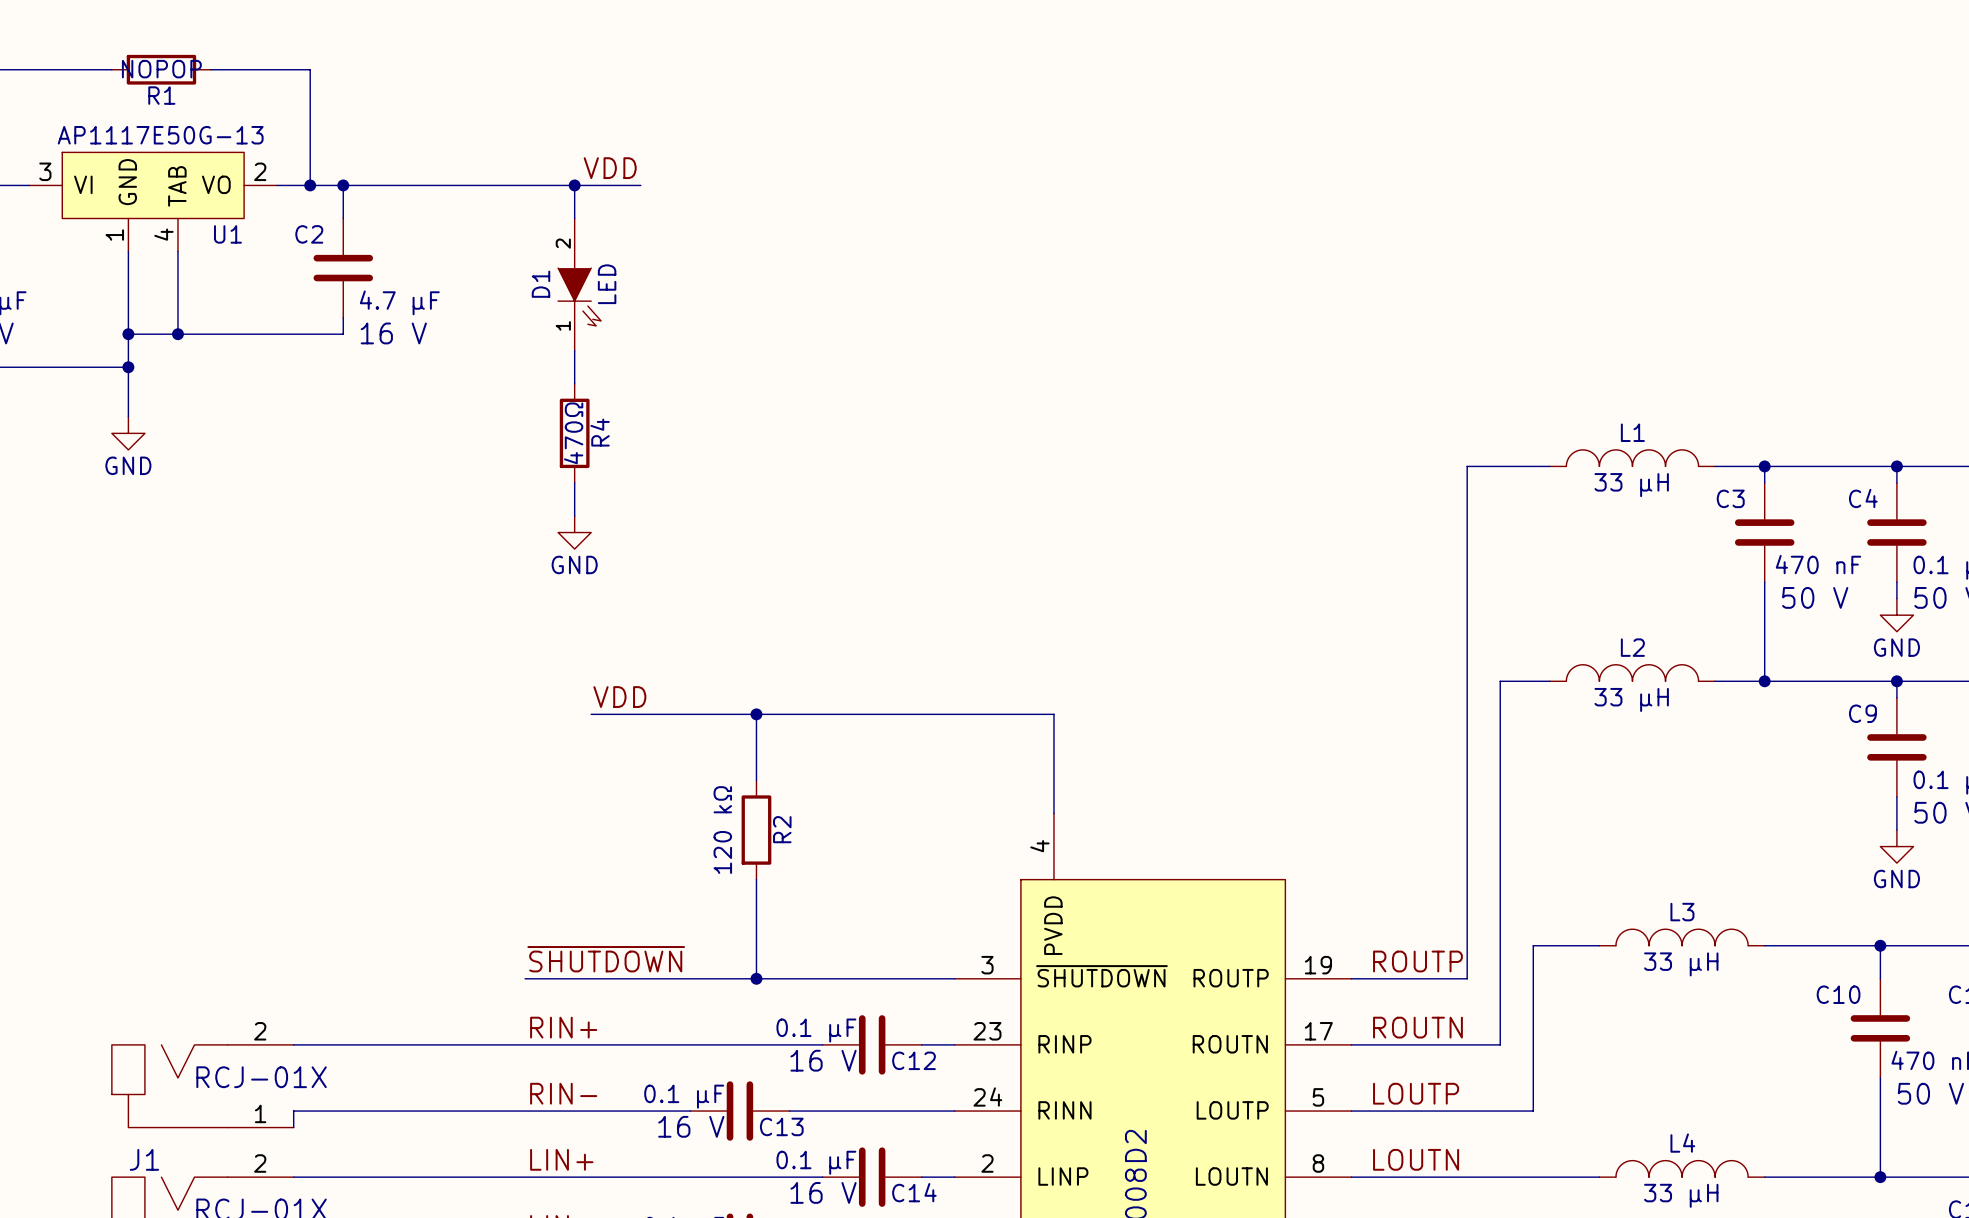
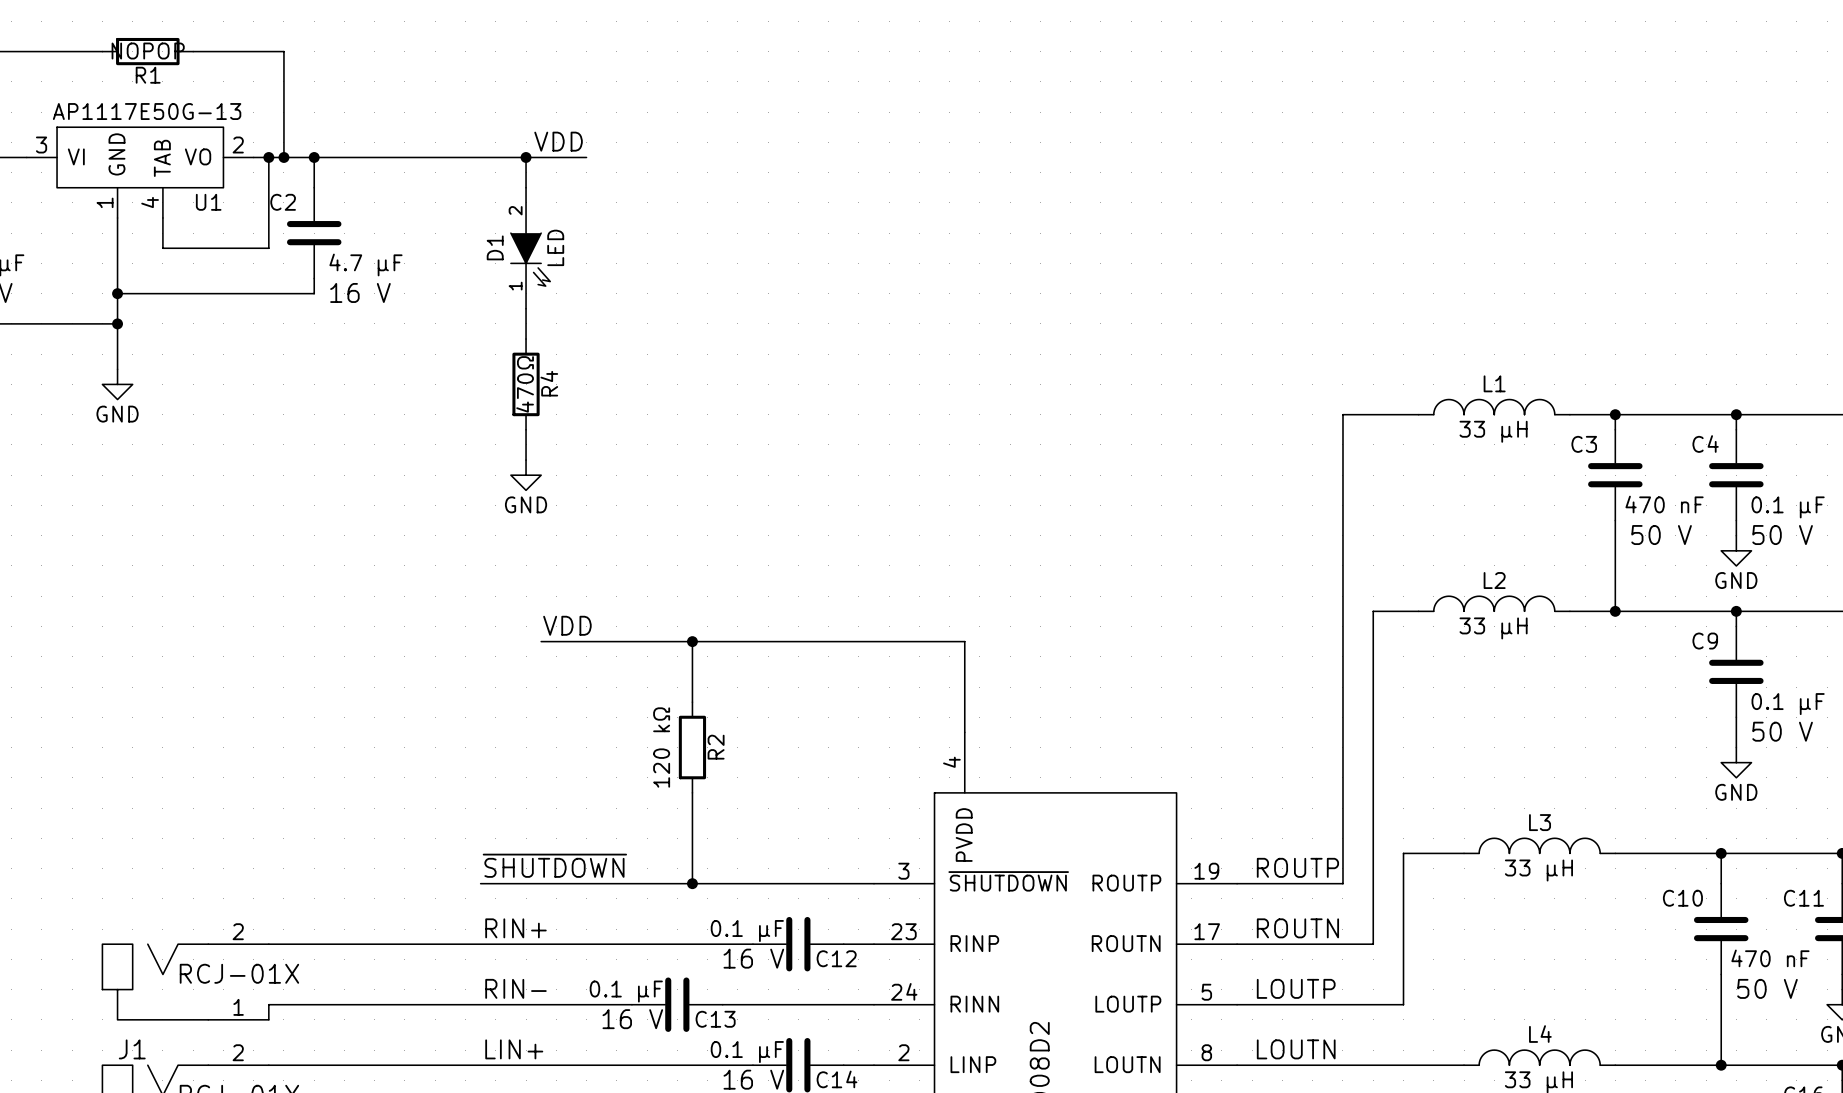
junction: none -> (268, 157)
wire: (177, 284) (177, 334) -> (162, 248) (268, 248) (268, 157)
junction: (177, 334) -> none

